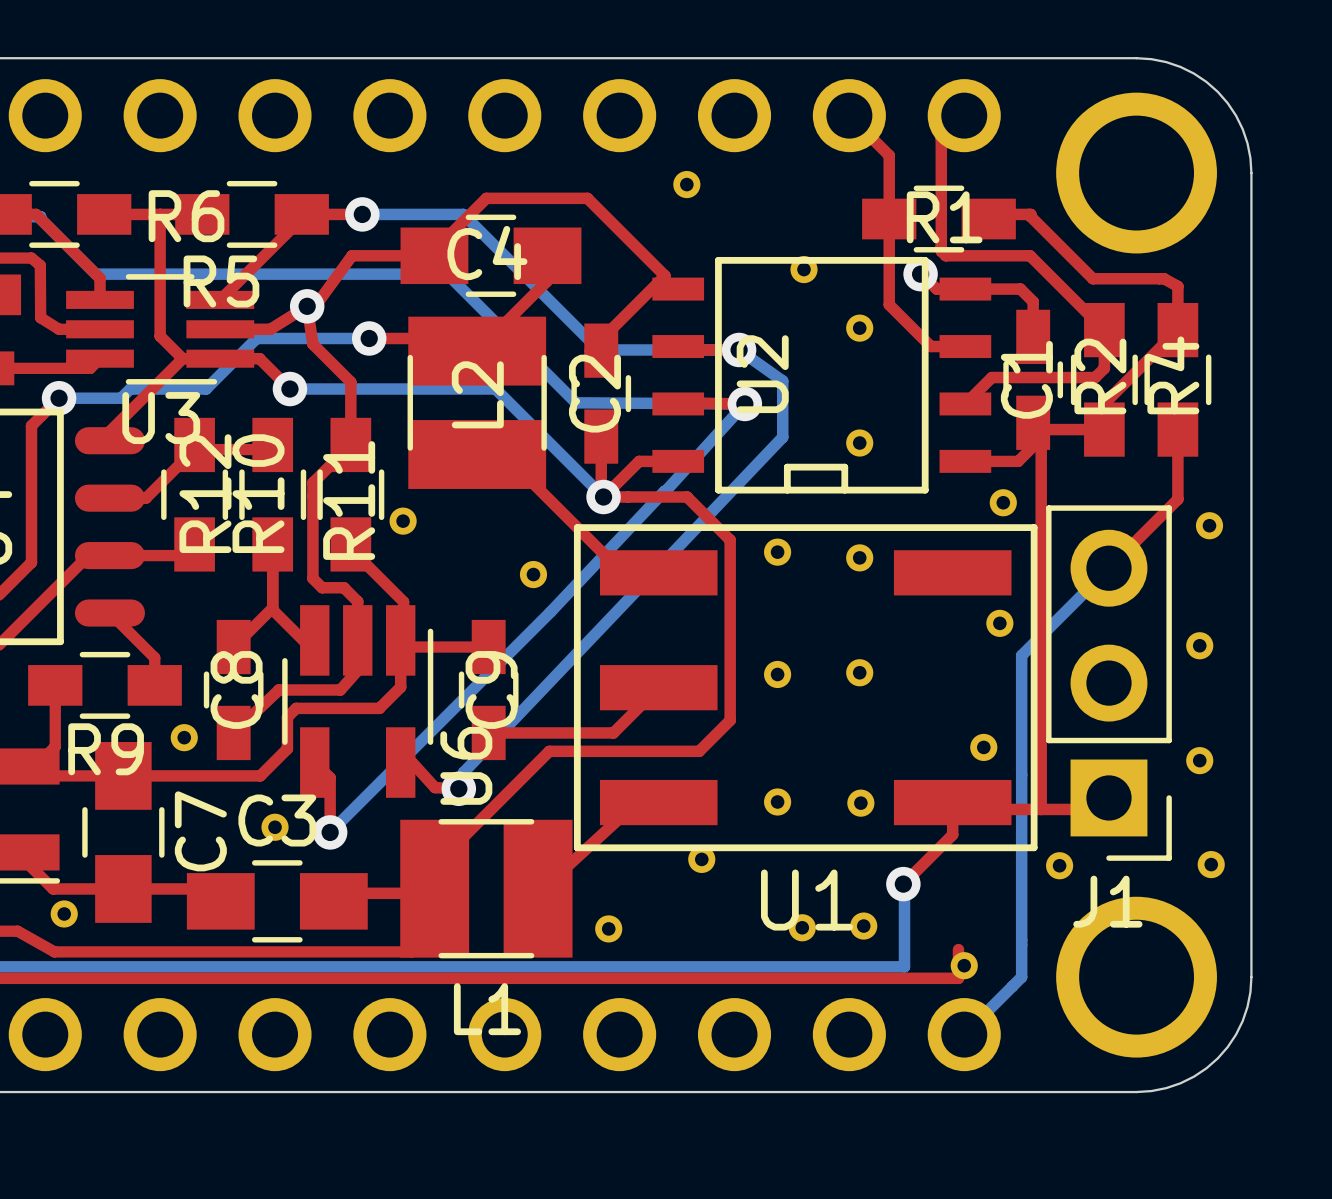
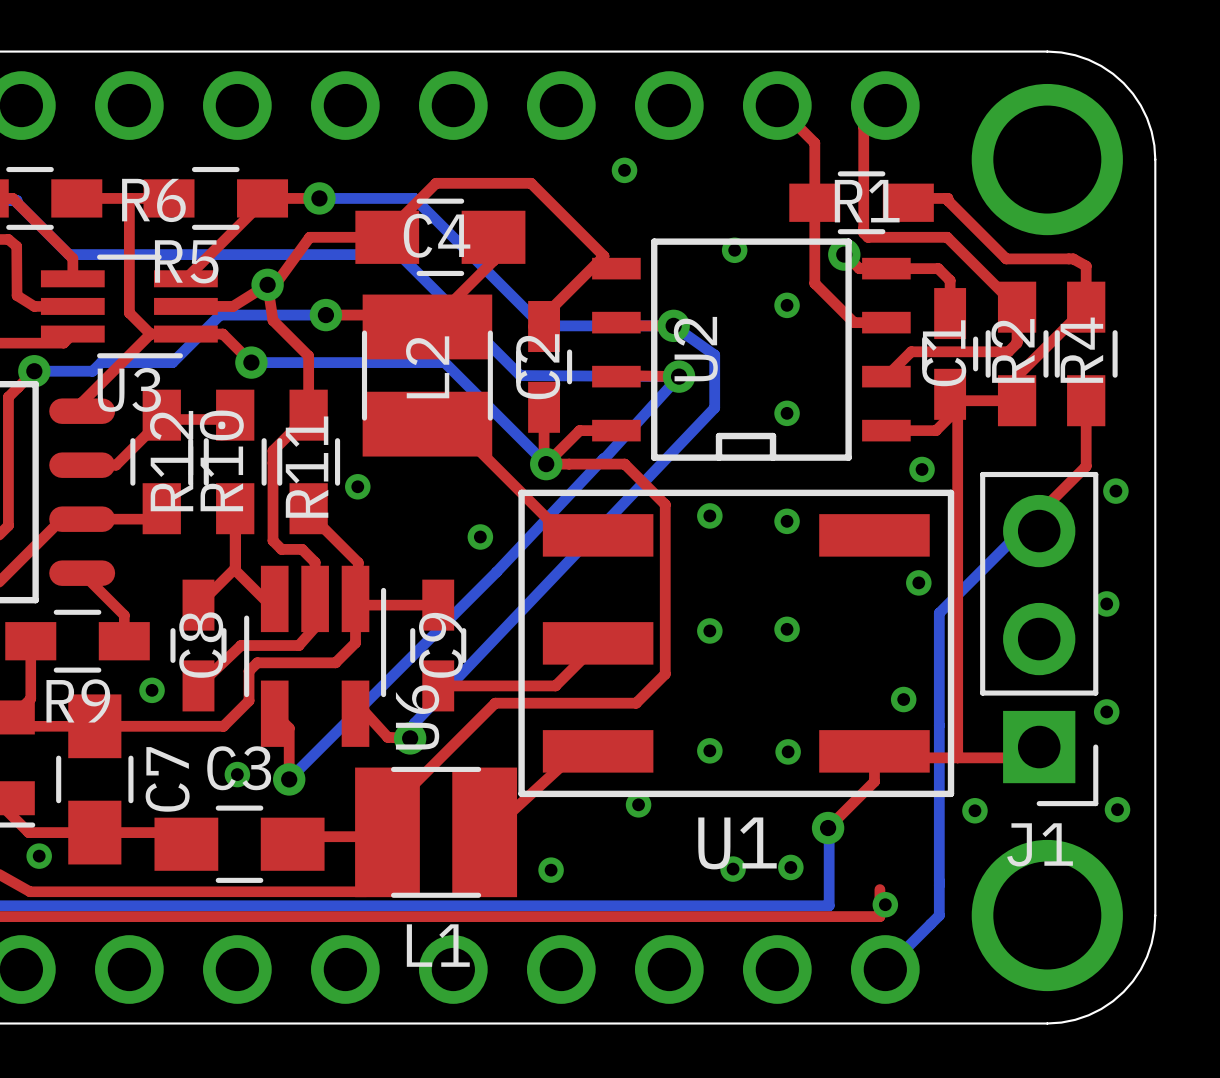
J1 position: (1108, 683) -> (1039, 639)

